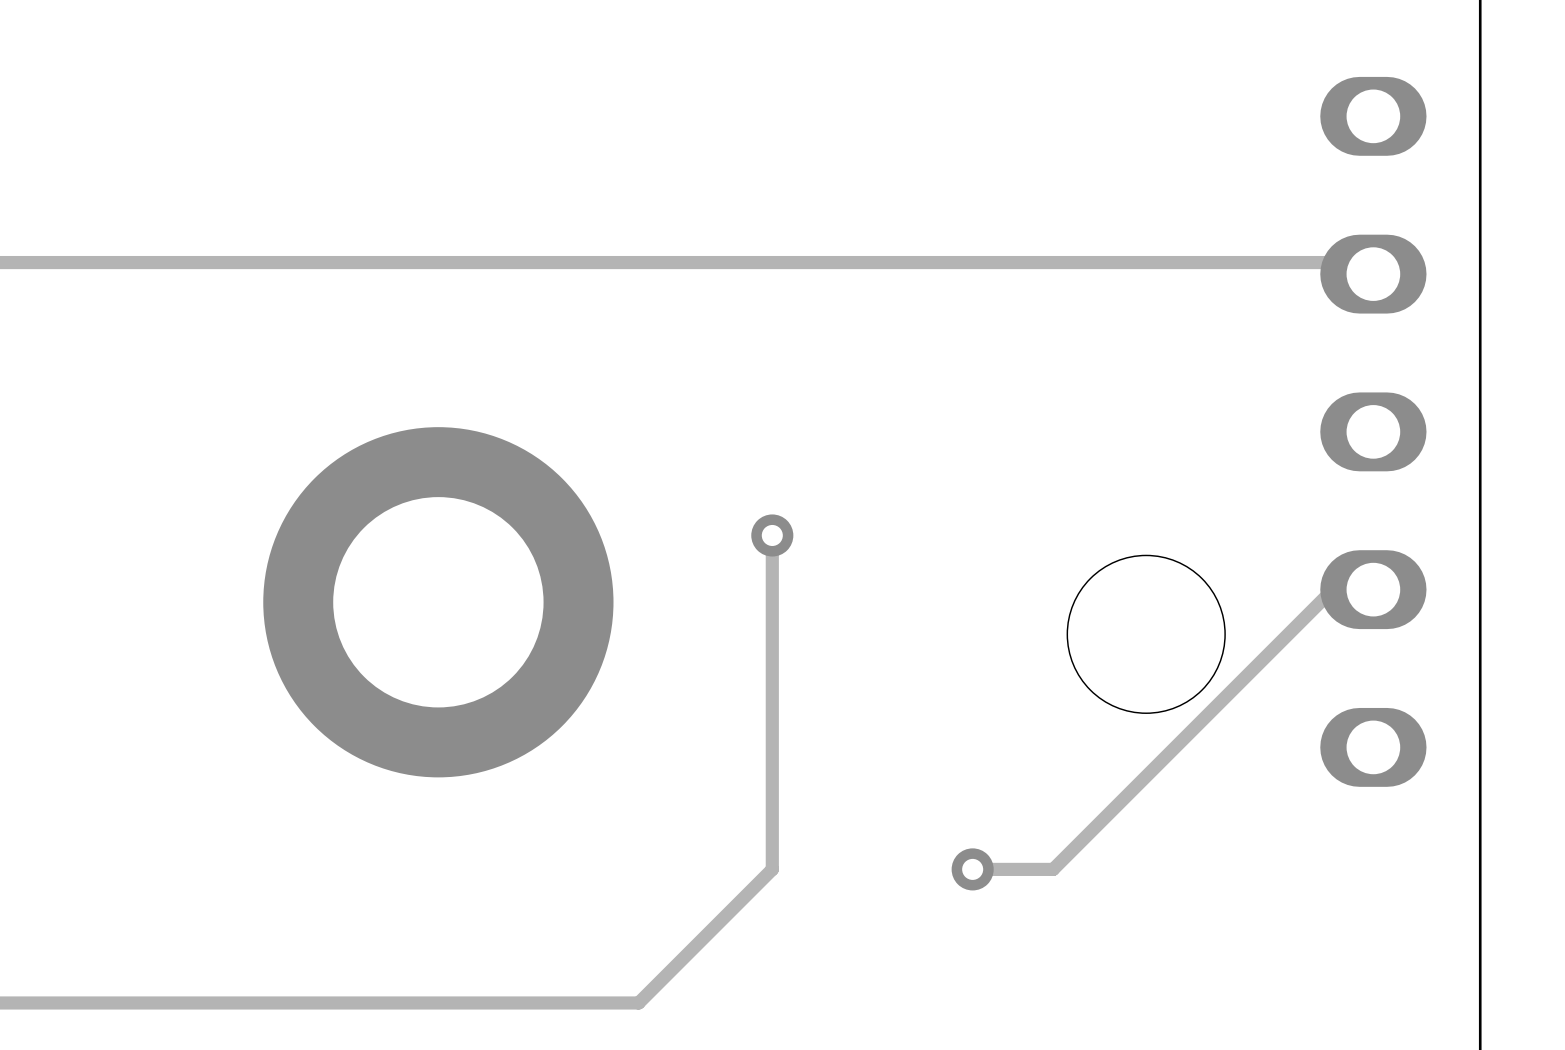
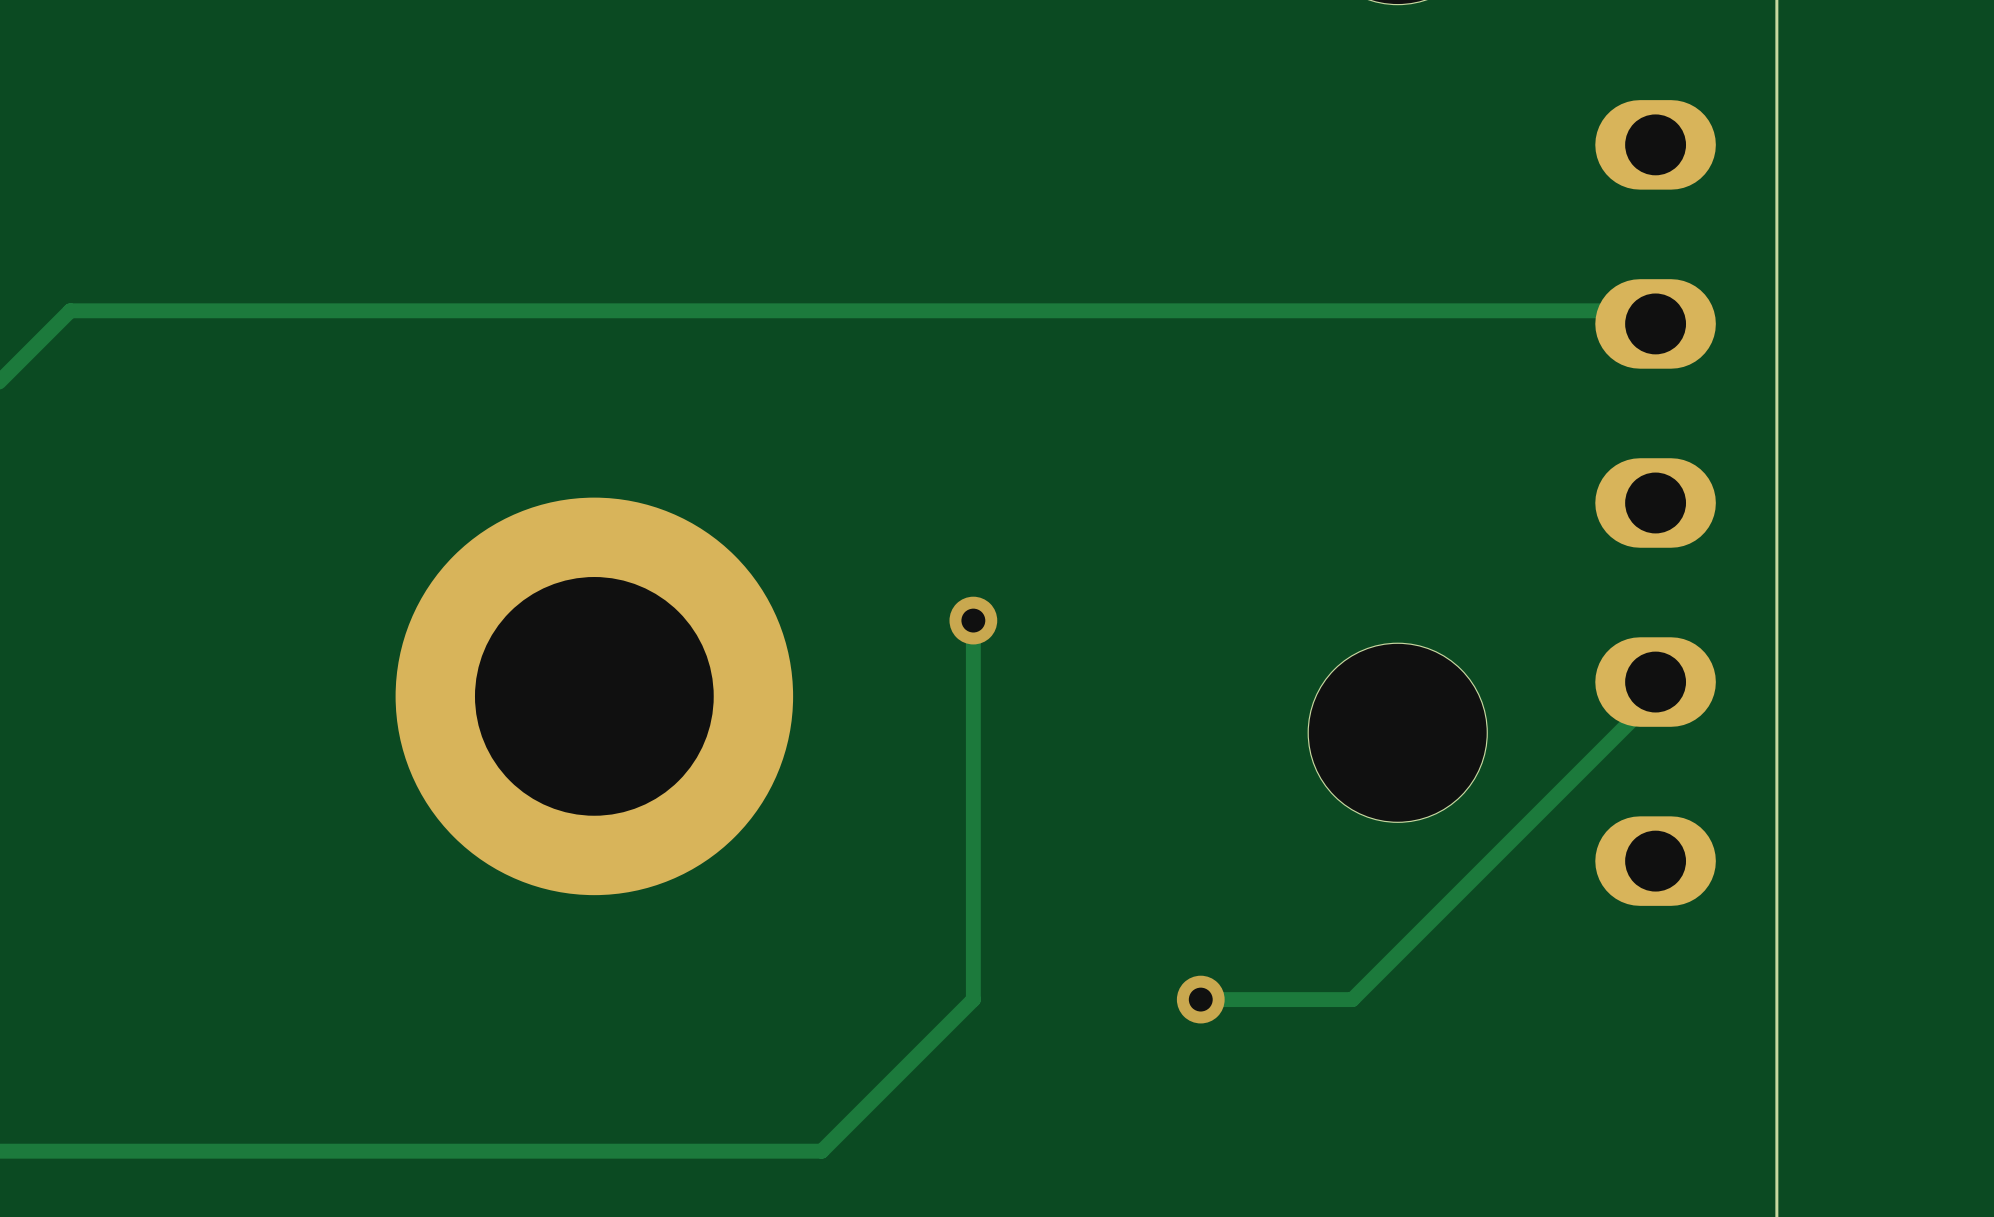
track: (1373, 589) (1332, 589) (1053, 869) -> (1655, 682) (1655, 696) (1352, 999) (1292, 999)

